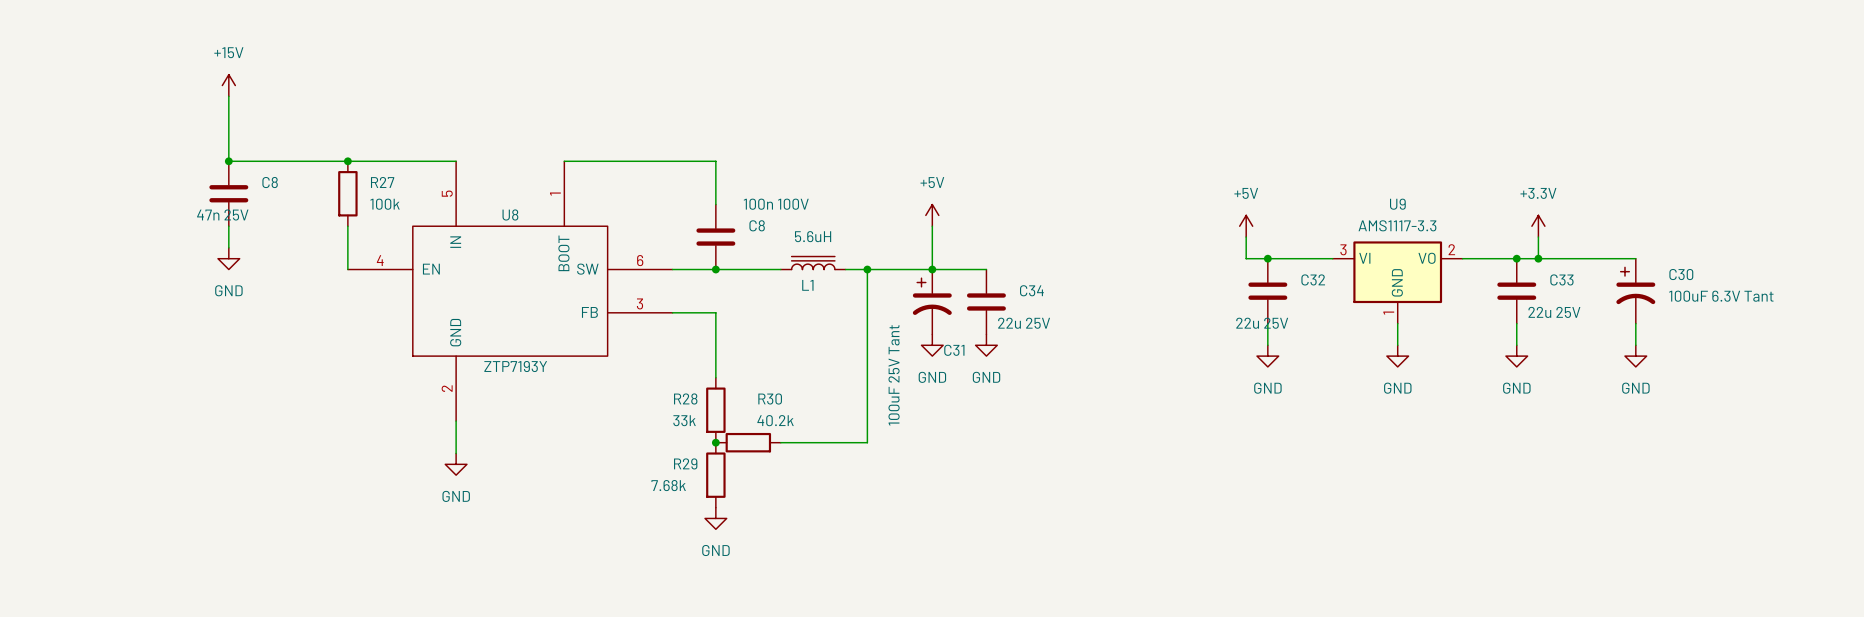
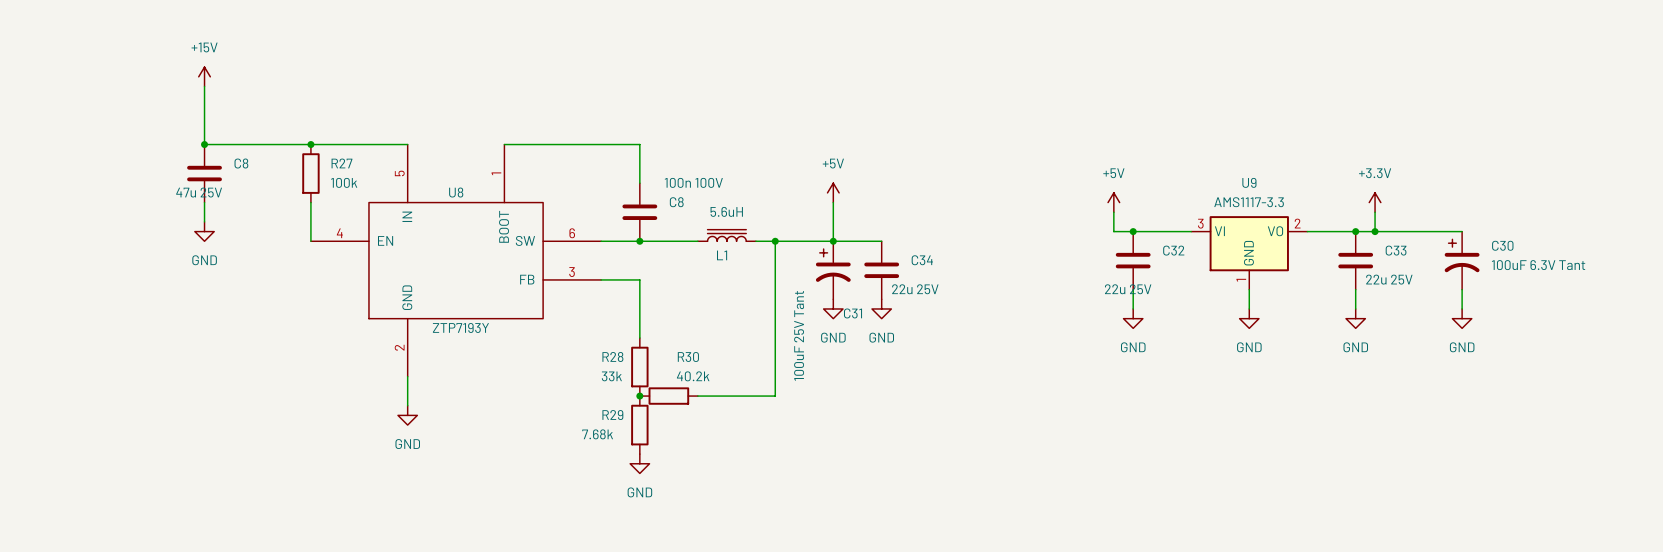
C8 value: 47n 25V (222, 214) -> 47u 25V (199, 192)

